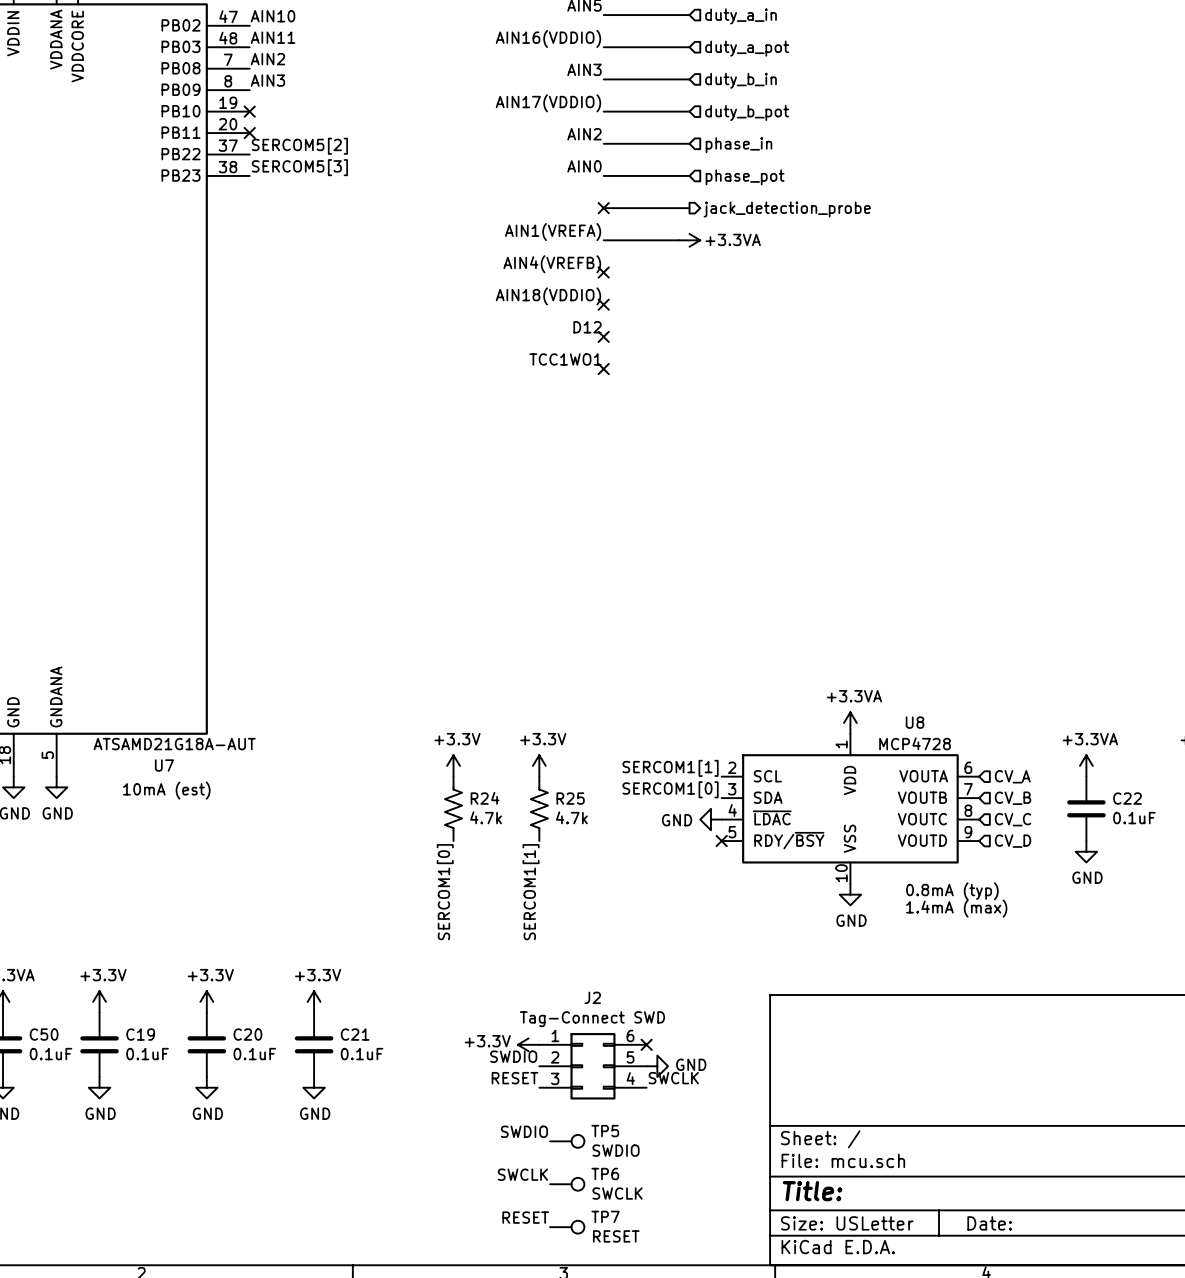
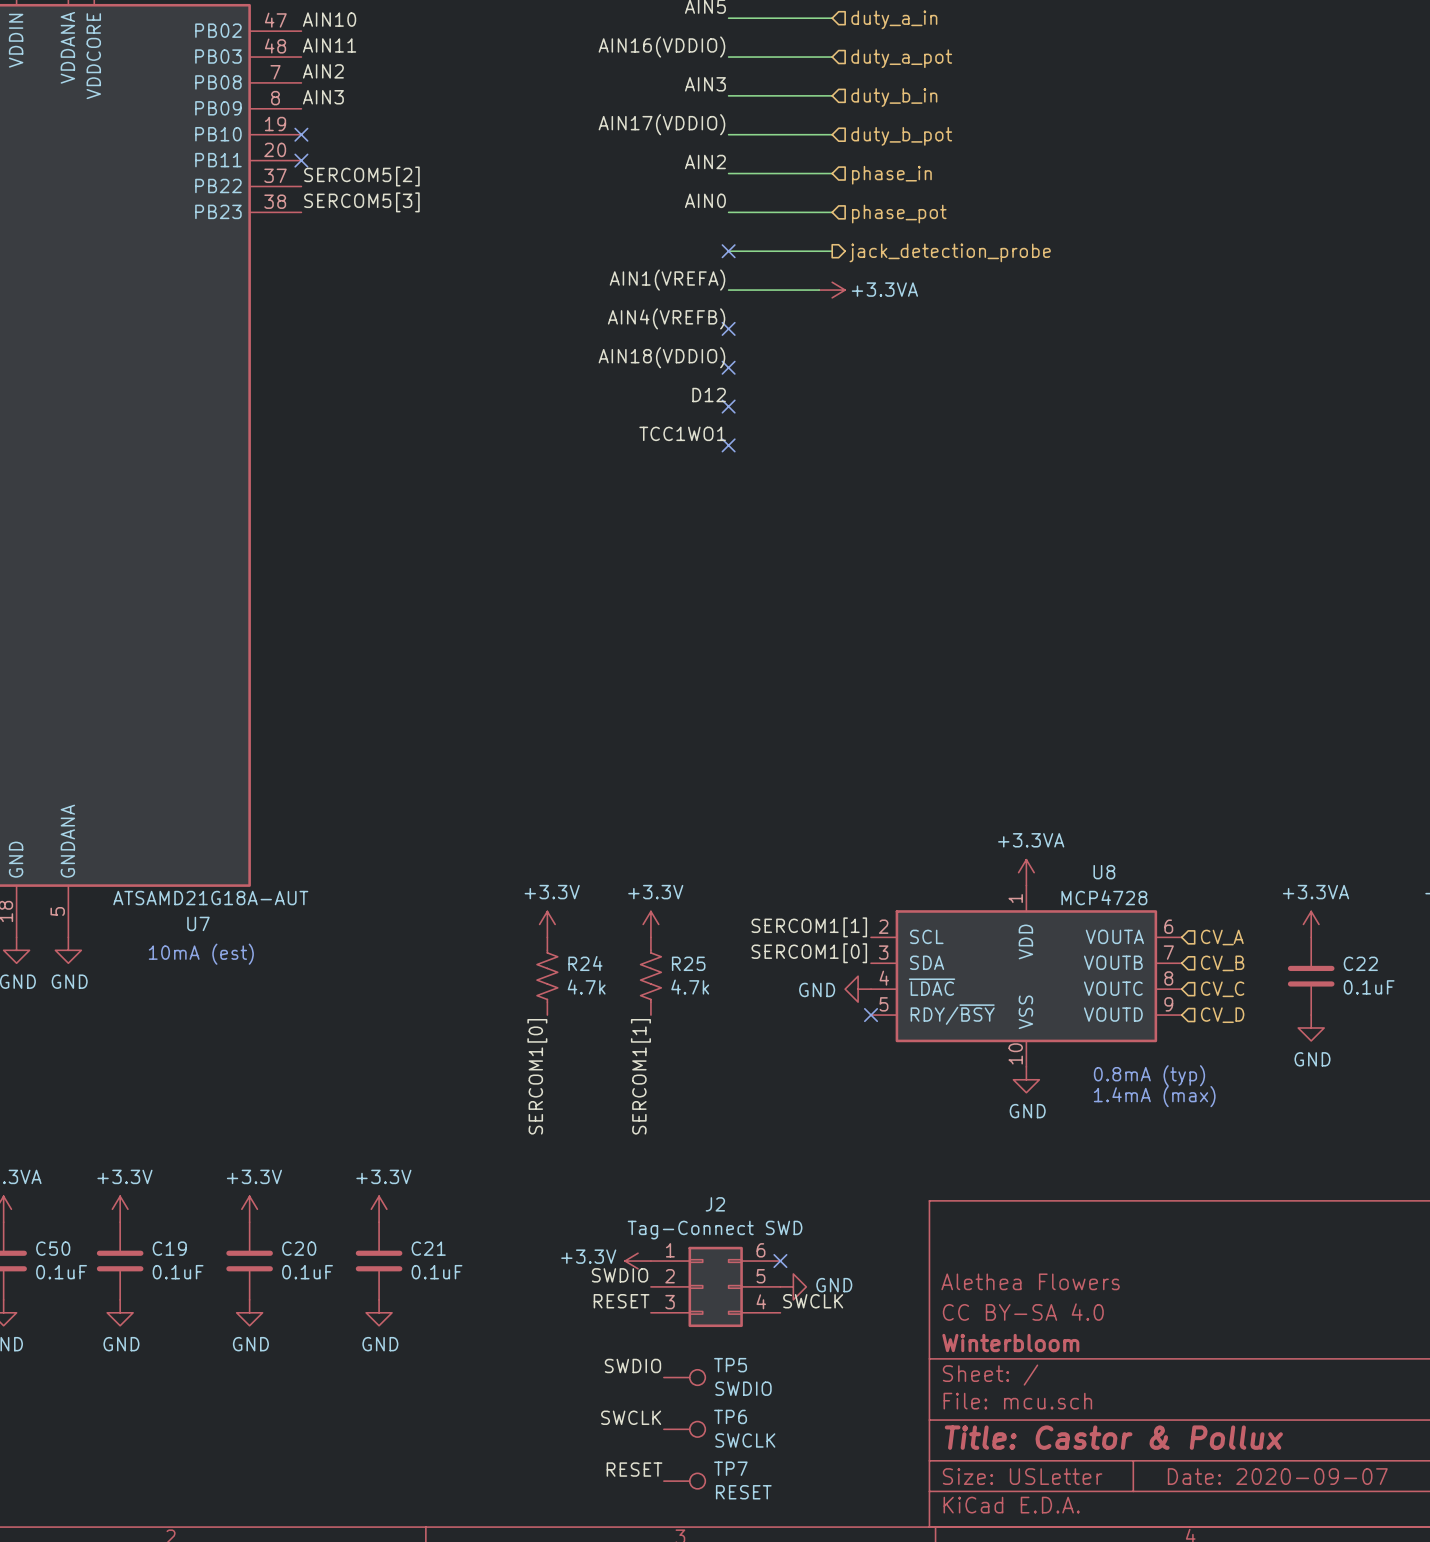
title block: none -> Alethea Flowers (1030, 1281)
title block: none -> CC BY-SA 4.0 (1023, 1312)
title block: none -> Winterbloom (1010, 1343)
title block: Title: (812, 1191) -> Title: Castor & Pollux (1113, 1437)
title block: Date: (989, 1223) -> Date: 2020-09-07 (1277, 1476)

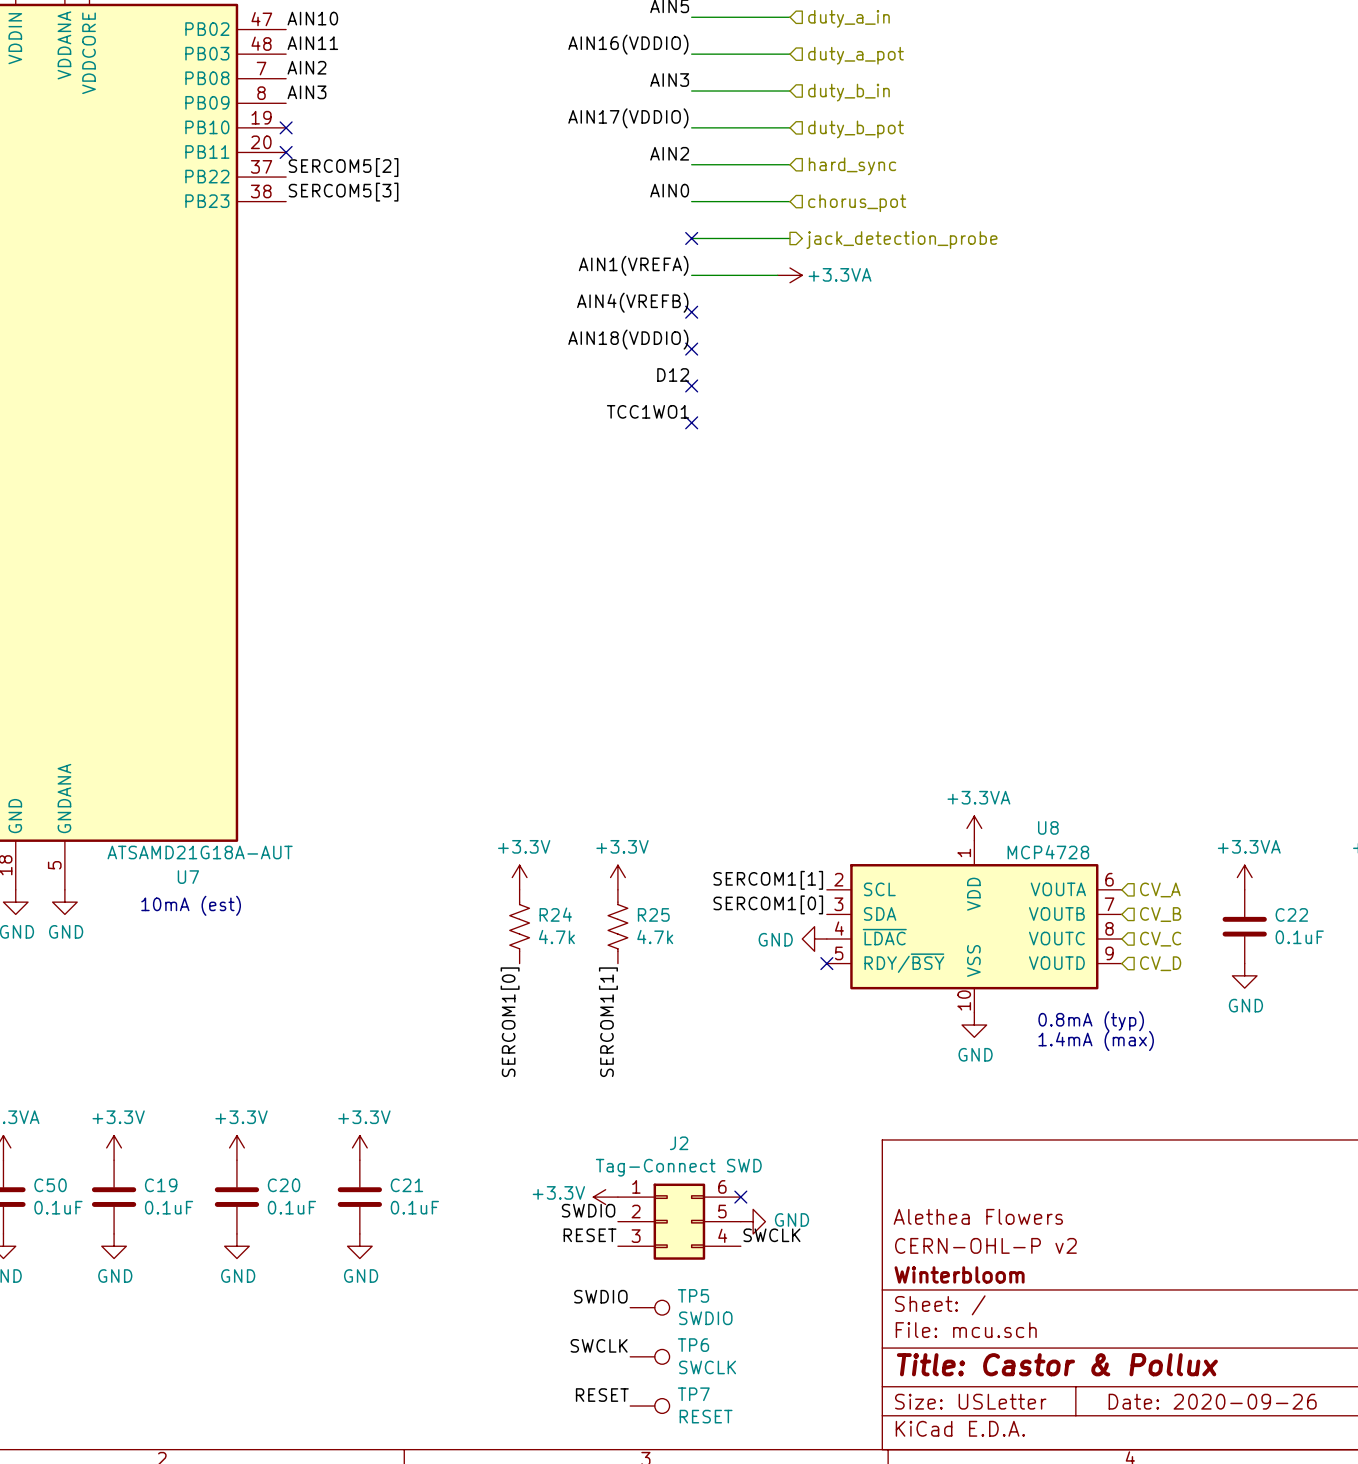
hierarchical label: phase_in (891, 175) -> hard_sync (852, 166)
hierarchical label: phase_pot (899, 214) -> chorus_pot (857, 203)
title block: CC BY-SA 4.0 (1023, 1312) -> CERN-OHL-P v2 (985, 1245)
title block: Date: 2020-09-07 (1277, 1476) -> Date: 2020-09-26 (1212, 1401)

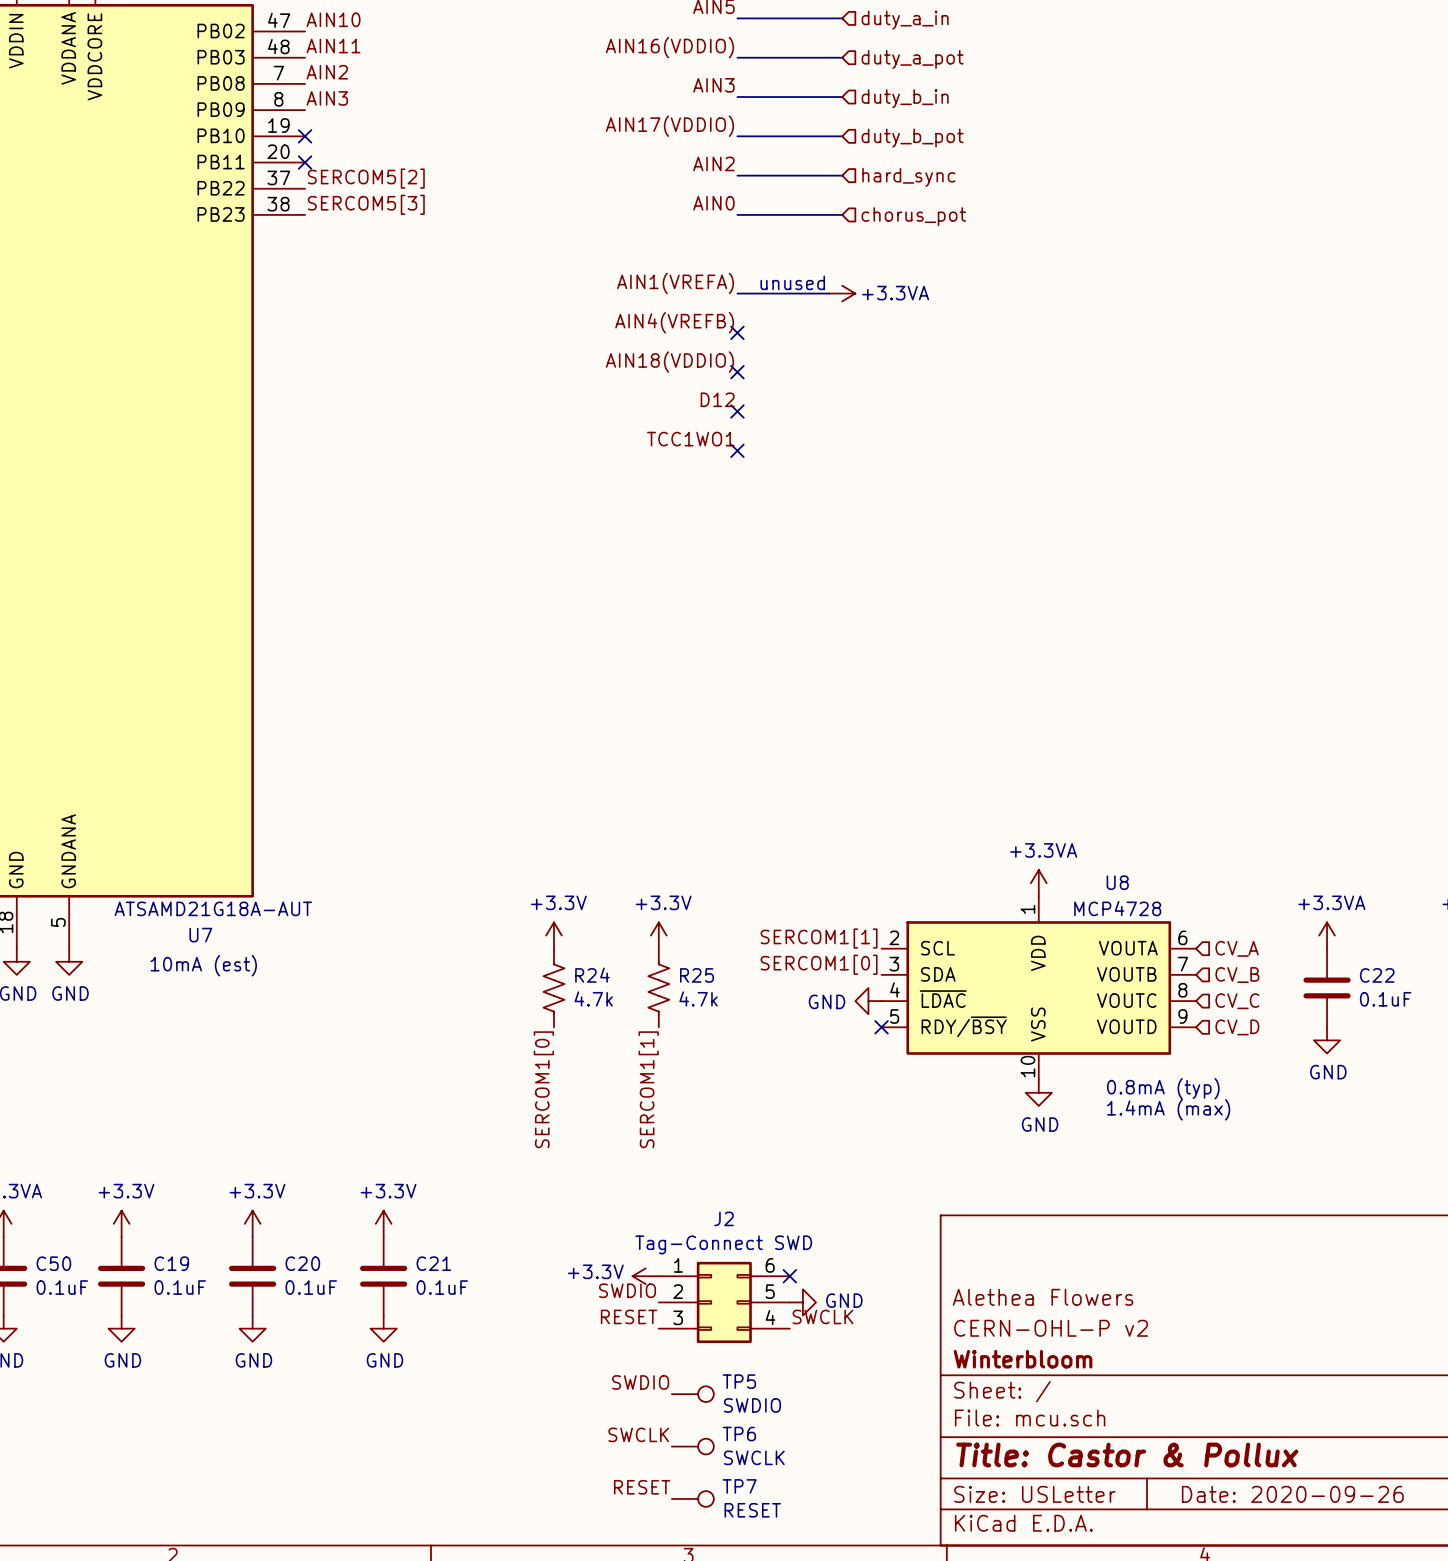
wire: (691, 238) (790, 238) -> none
no-connect mark: (691, 238) -> none
hierarchical label: jack_detection_probe (901, 240) -> none
text: none -> unused (792, 282)

